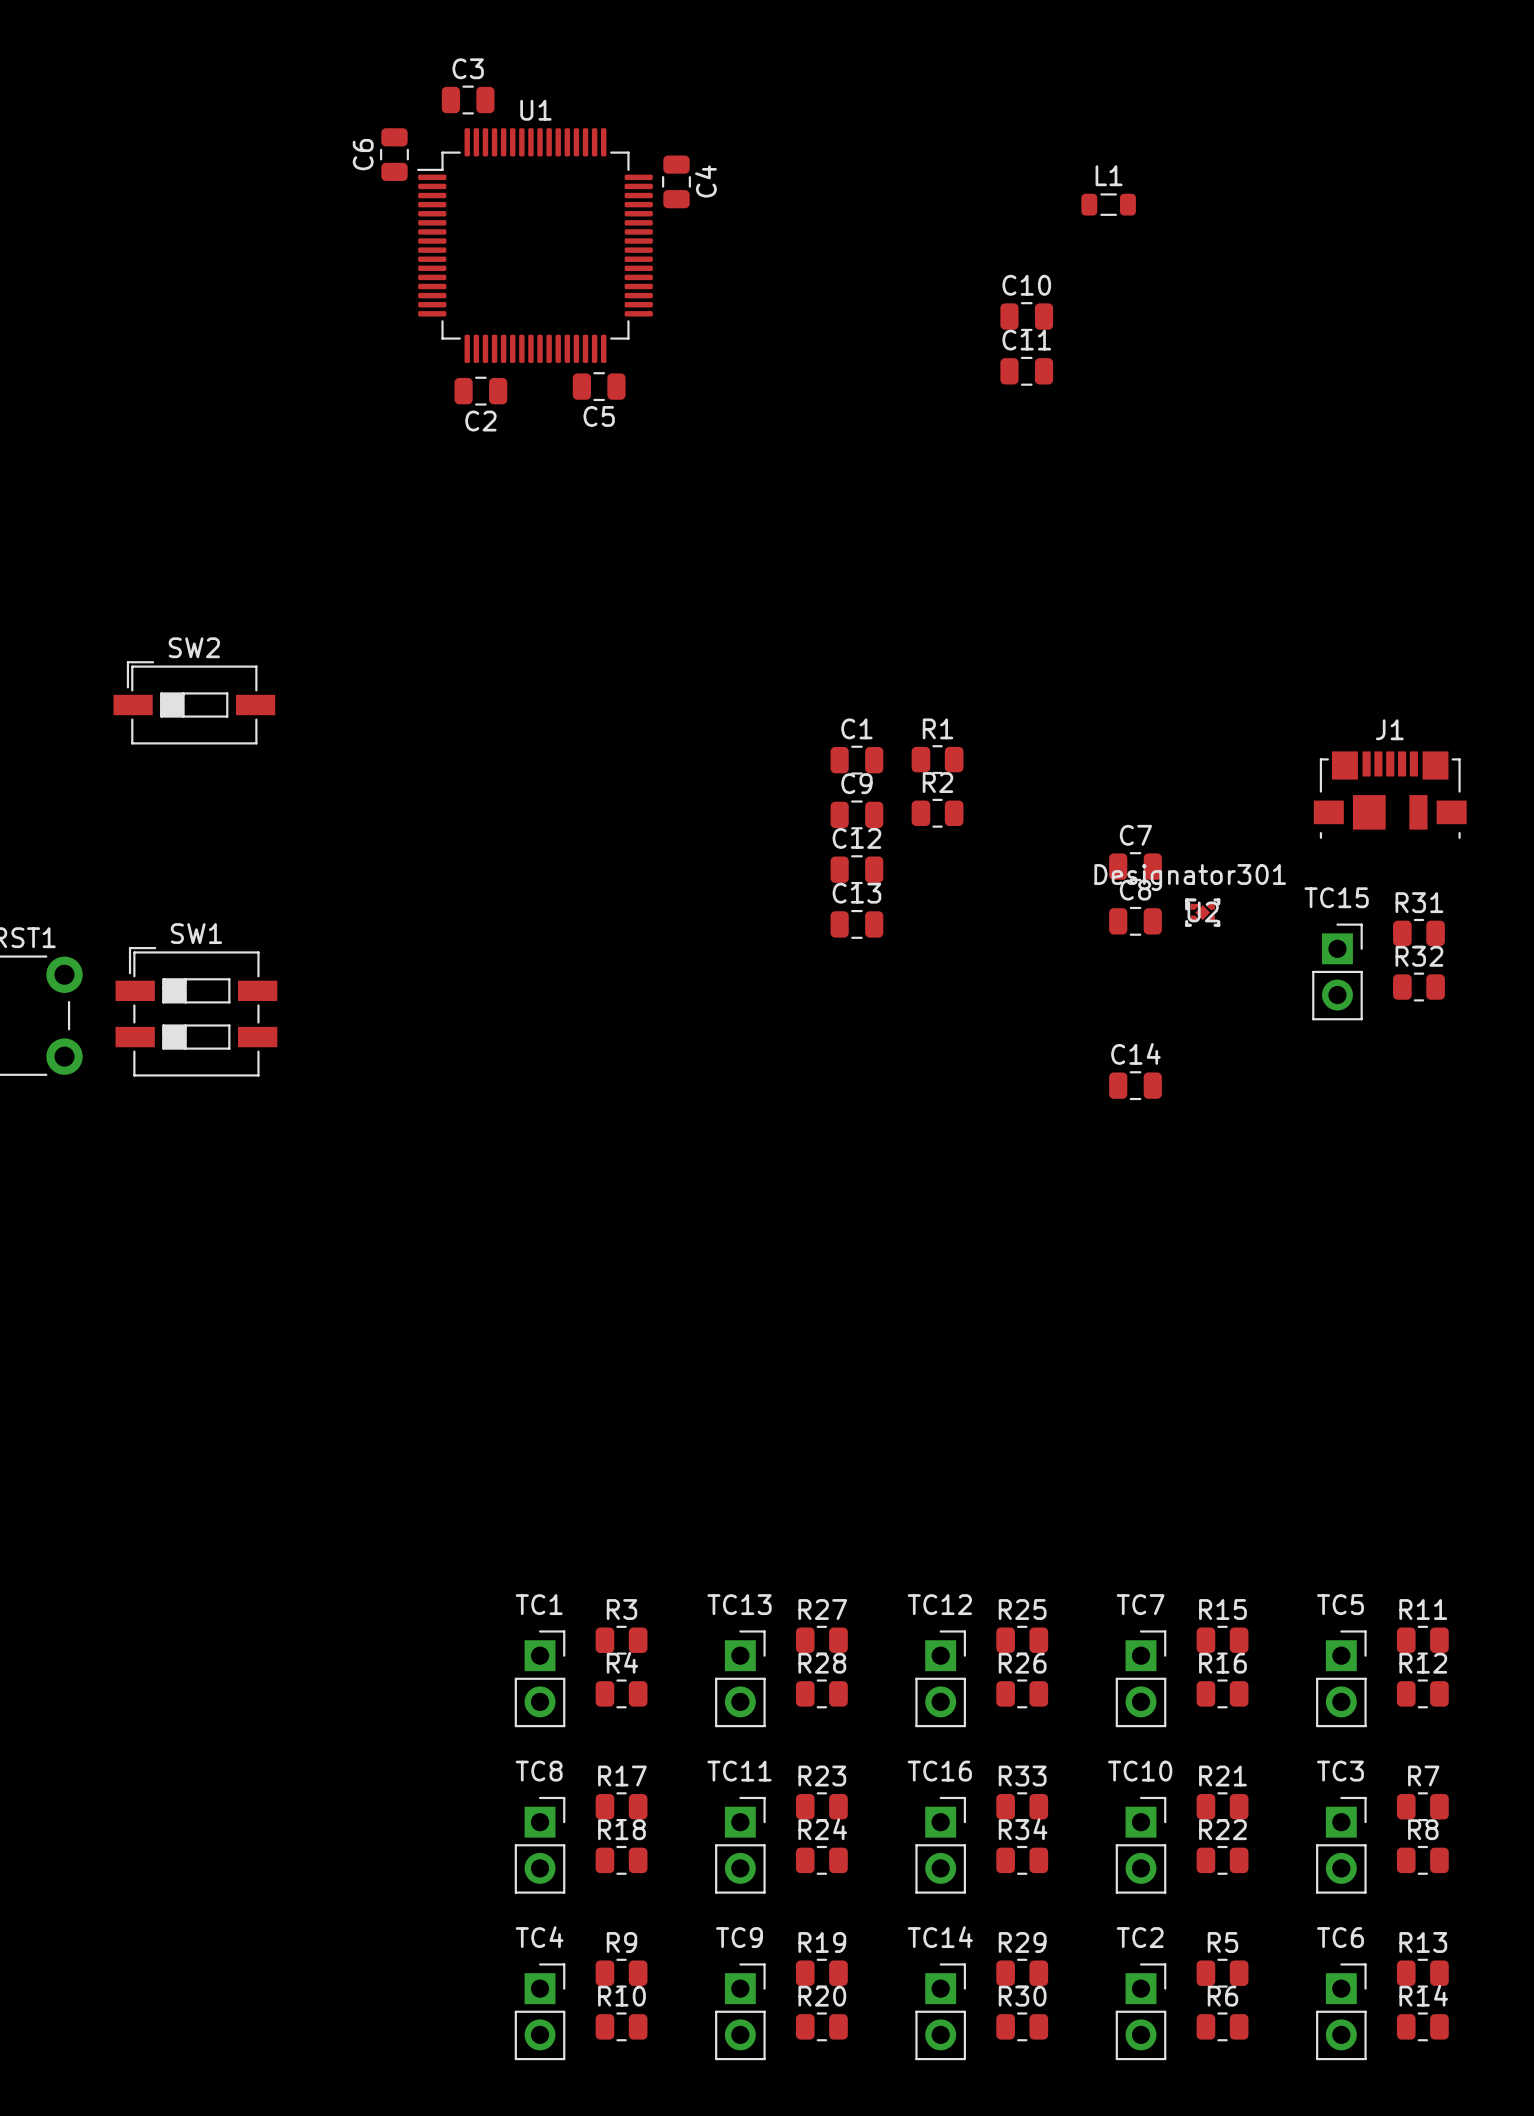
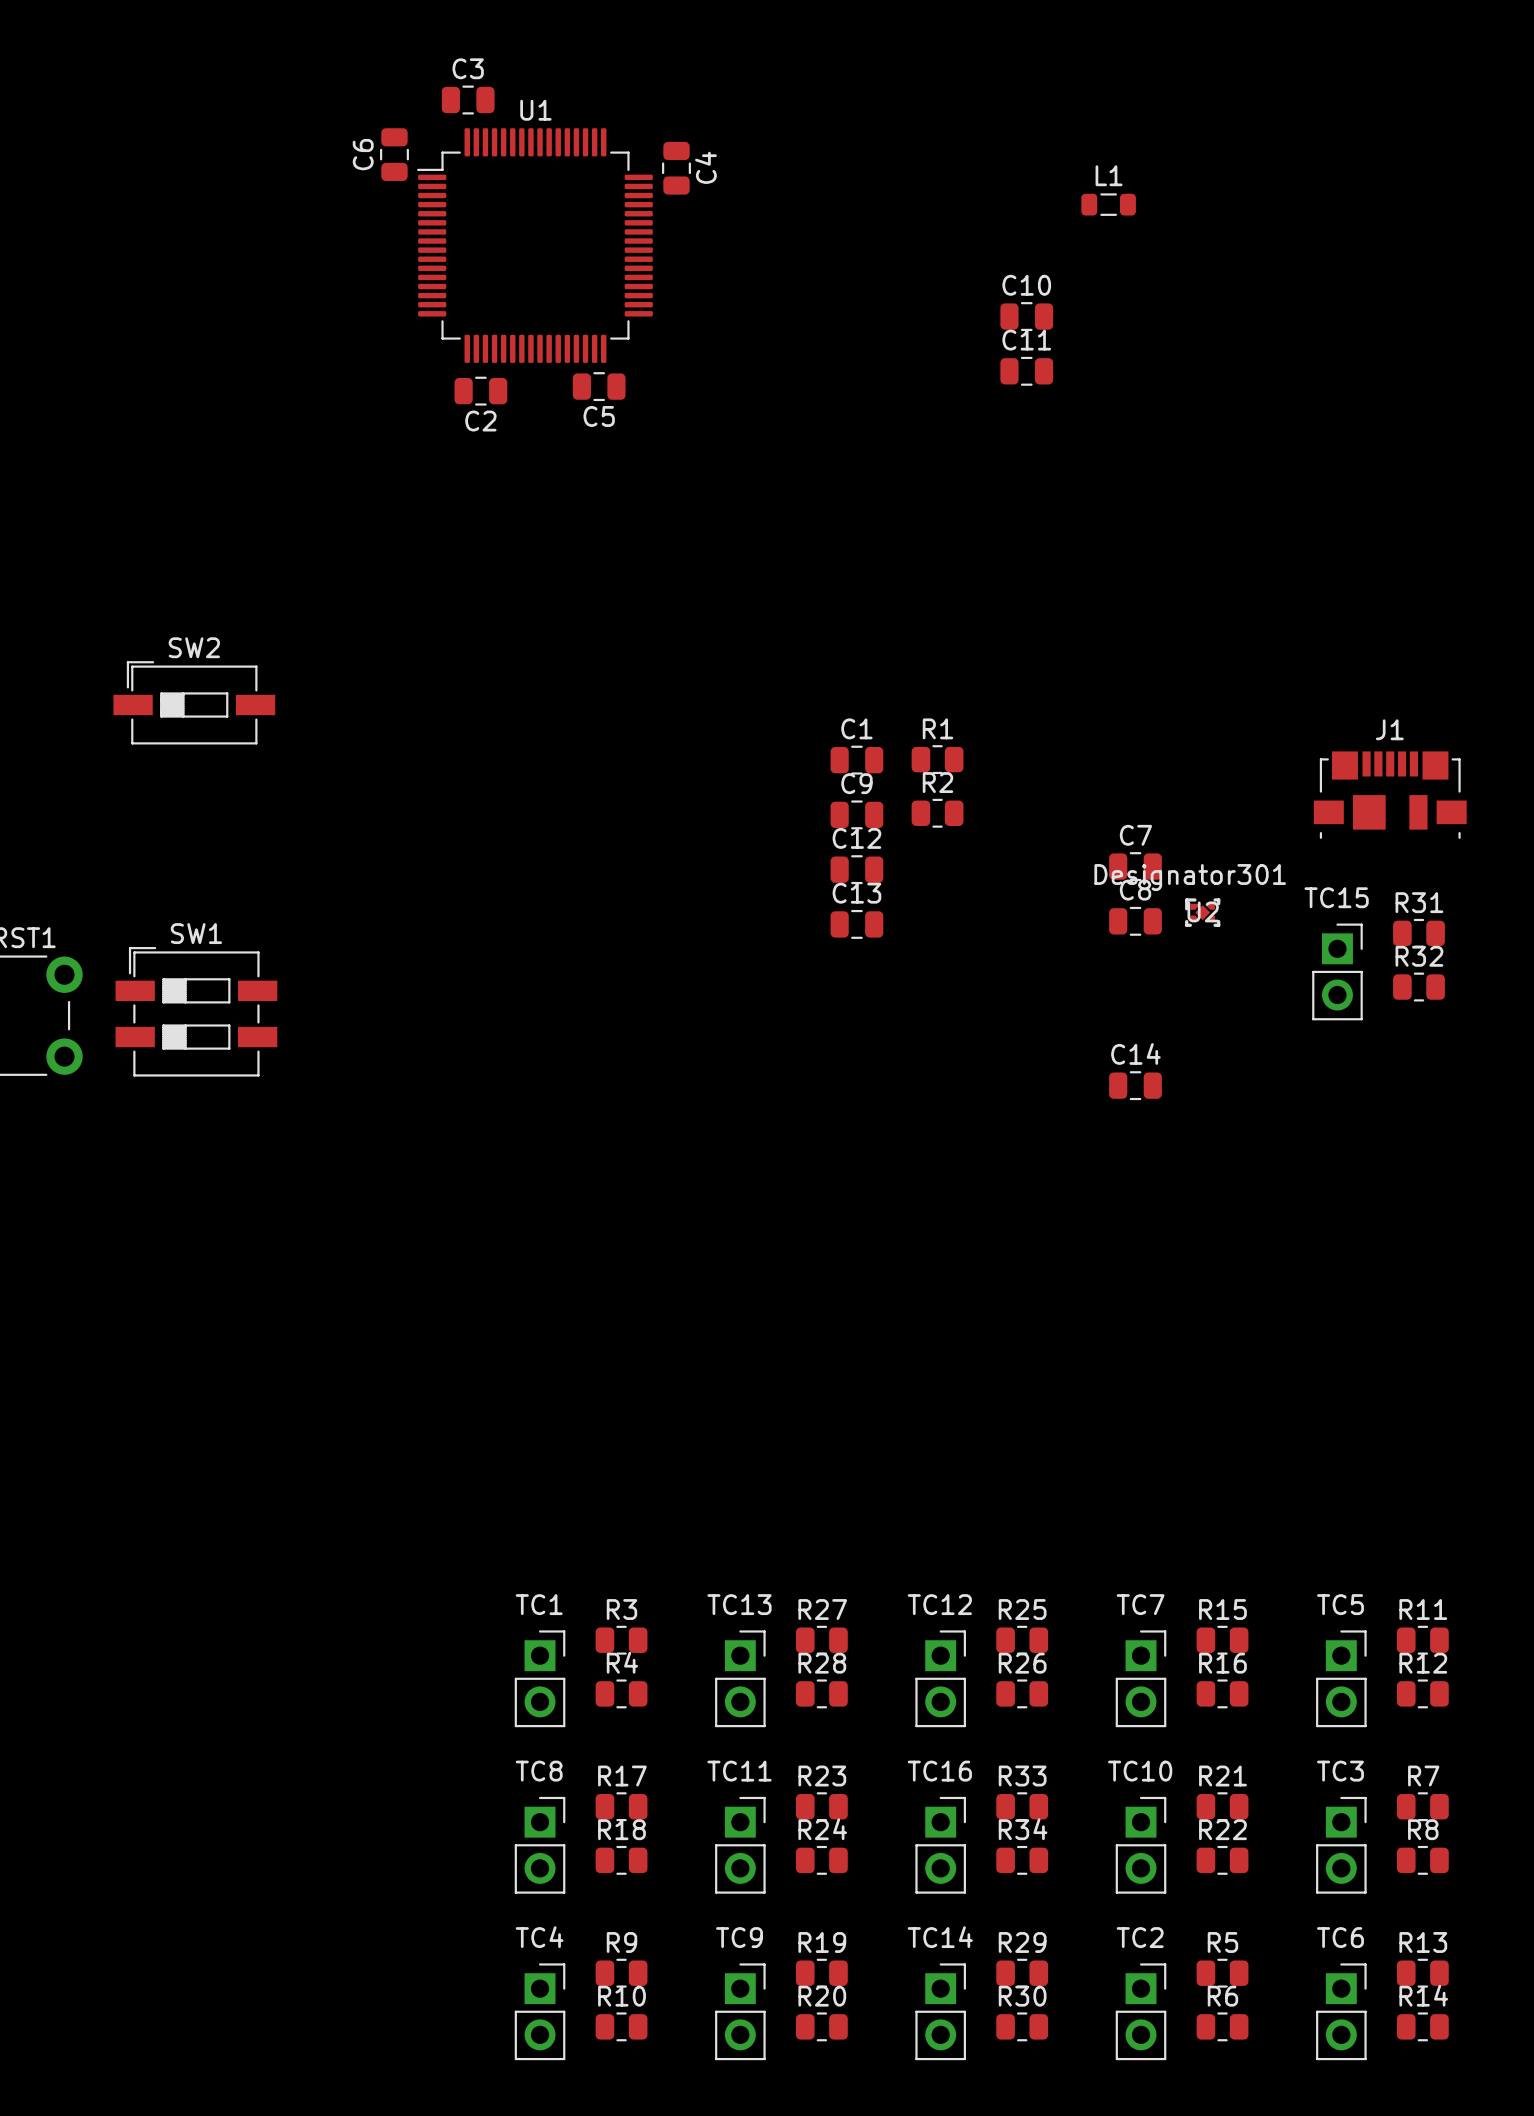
C4 position: (676, 181) -> (676, 168)

